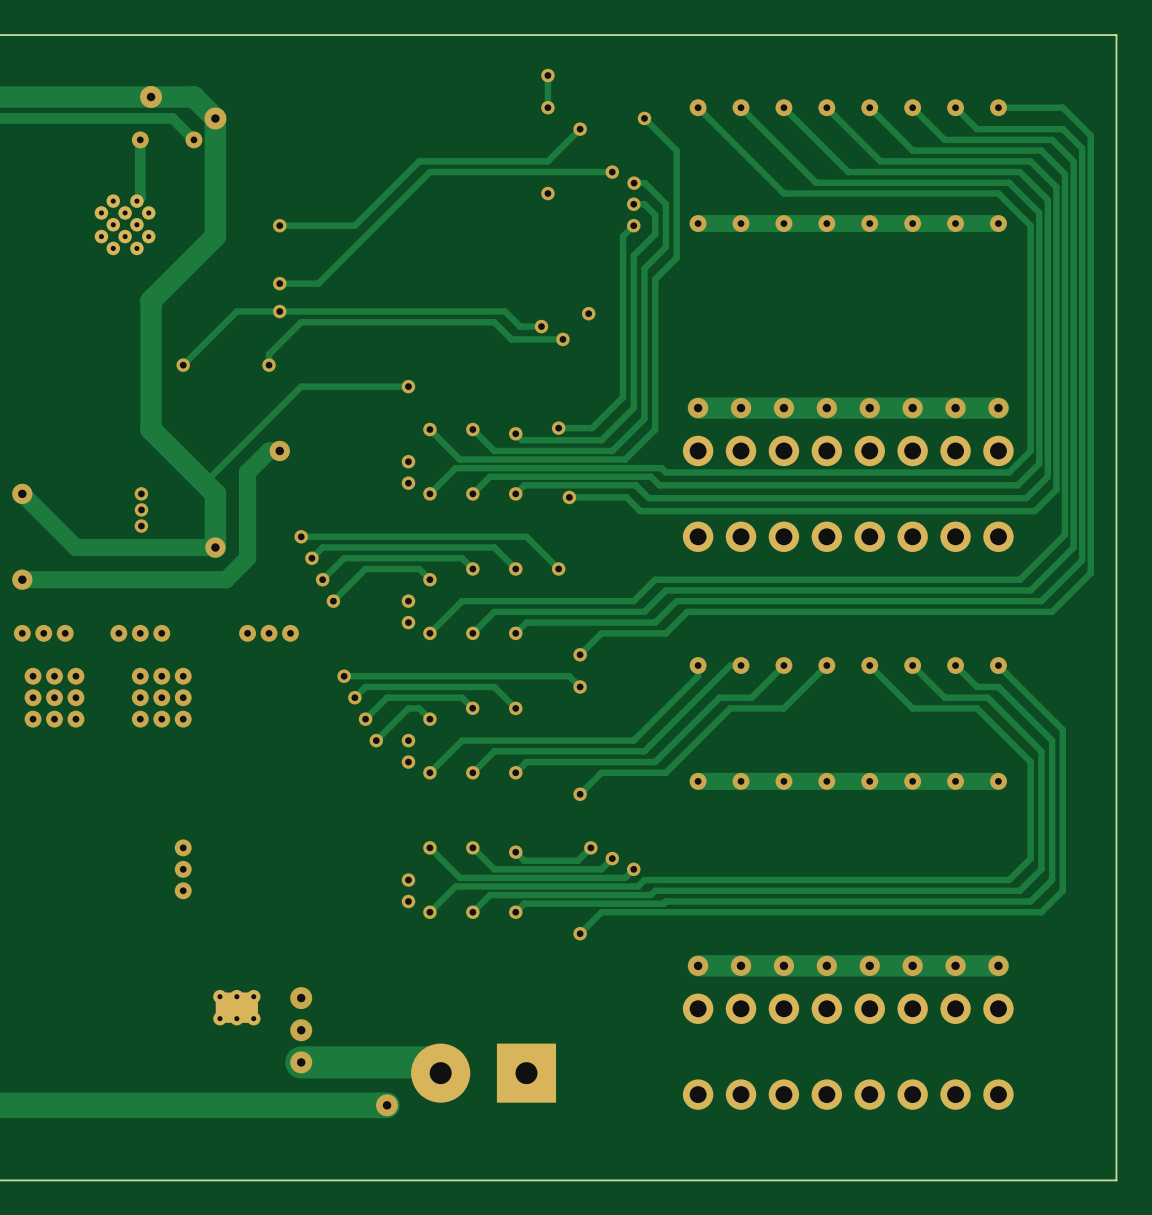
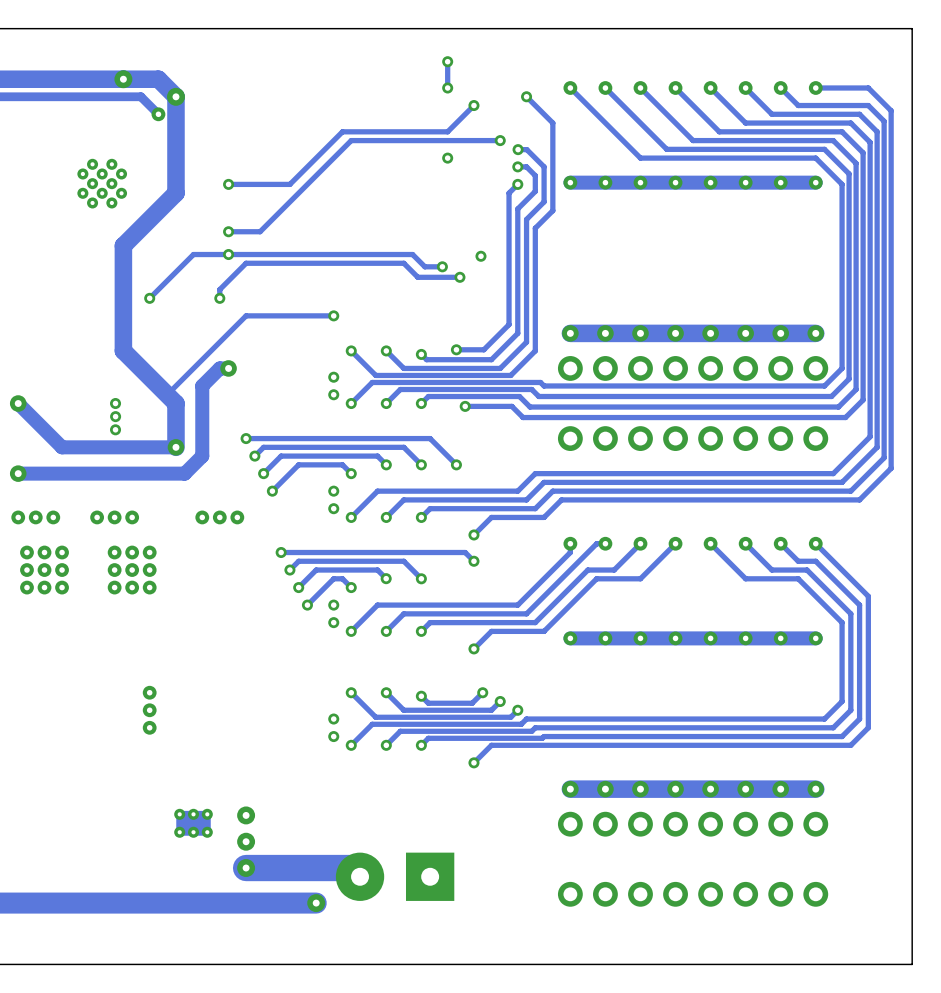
track: (140, 139) (140, 197) (136, 201) -> none
via: (140, 139) -> none

